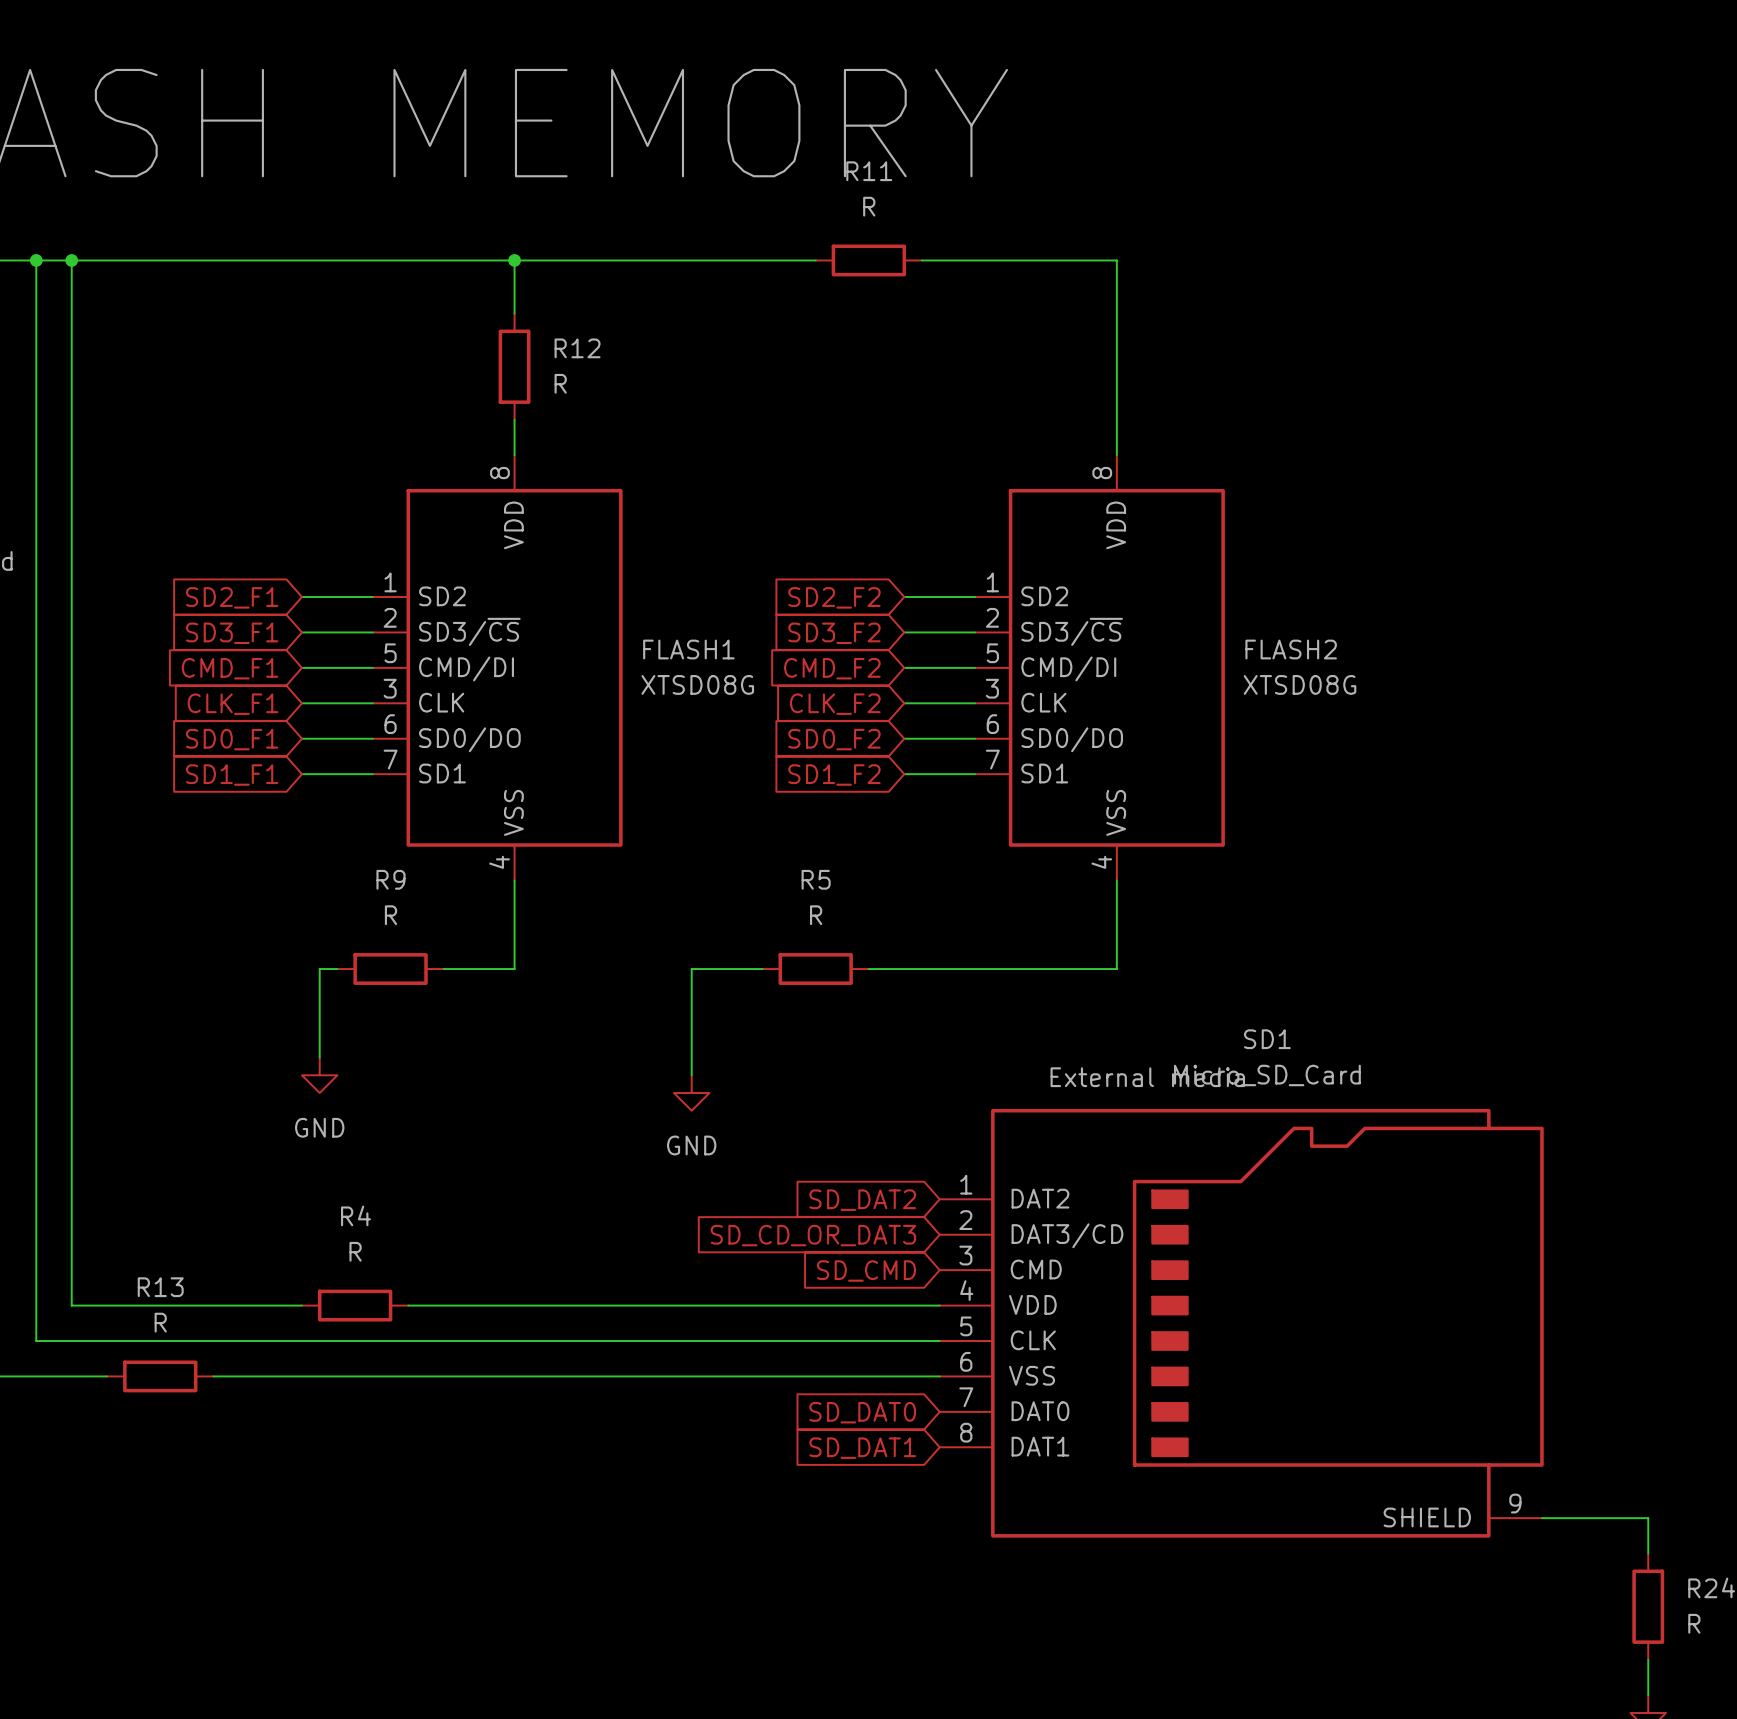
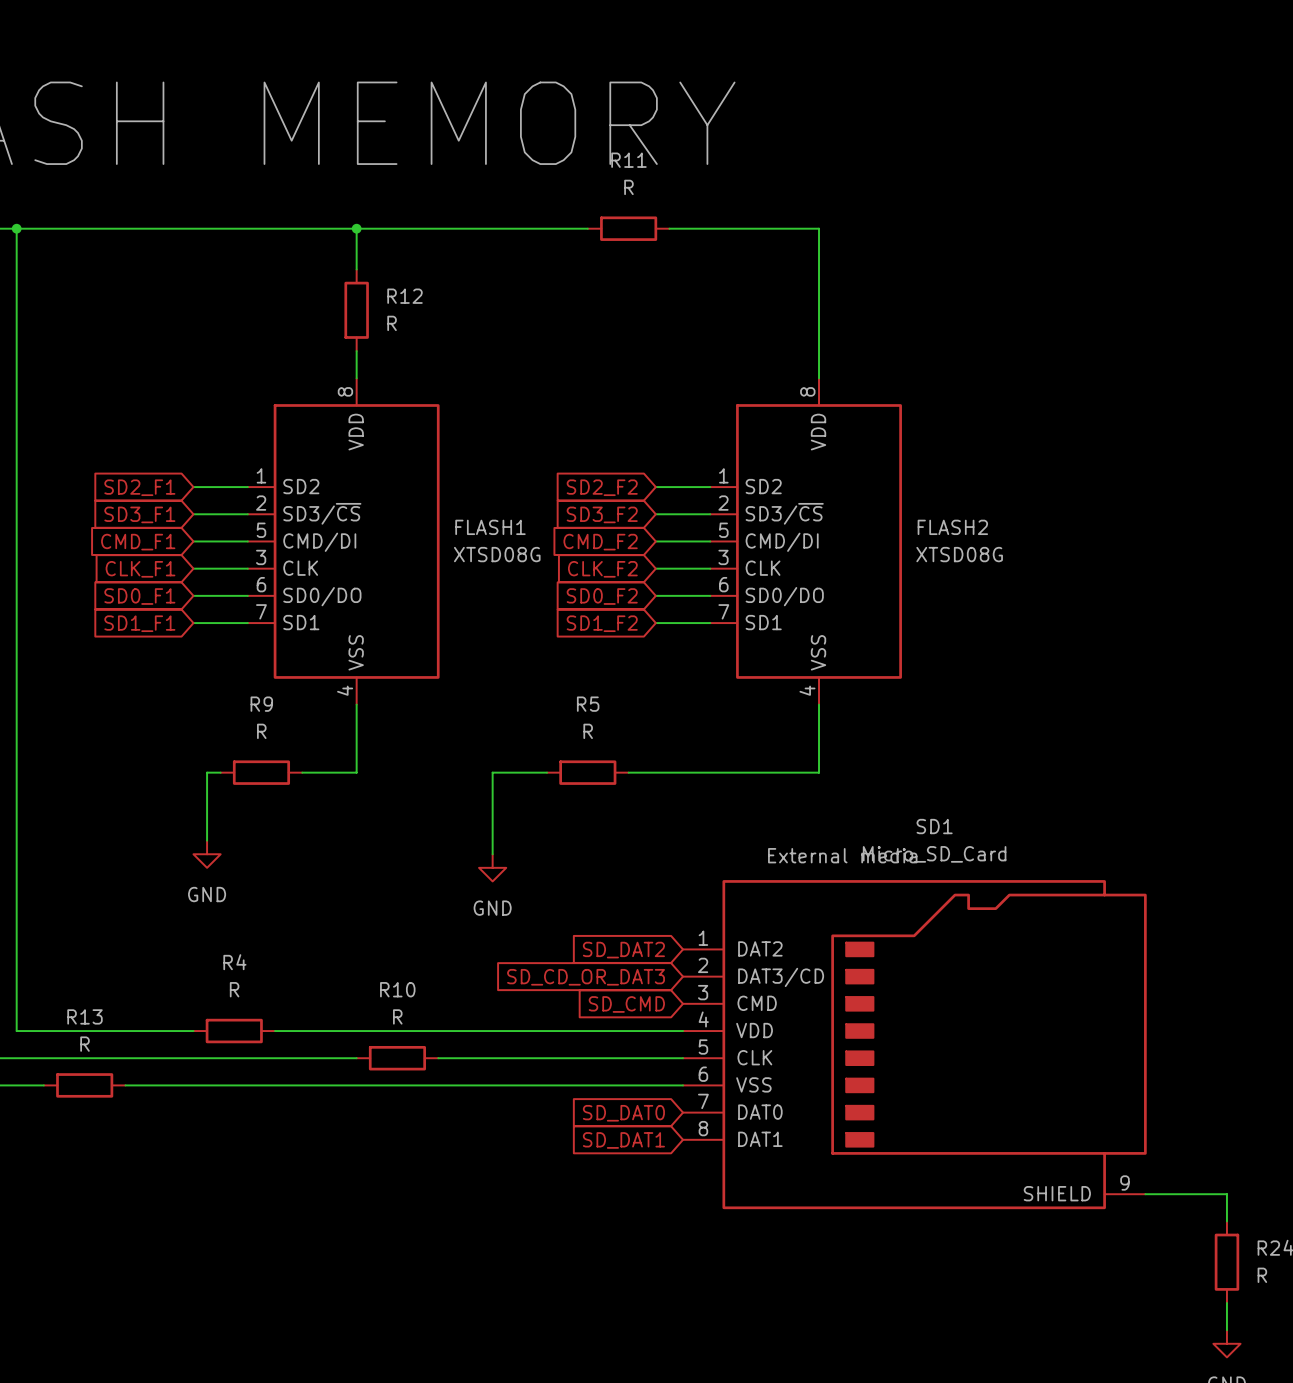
wire: (514, 1341) (620, 1341) -> none
R10: none -> R (397, 1058)

